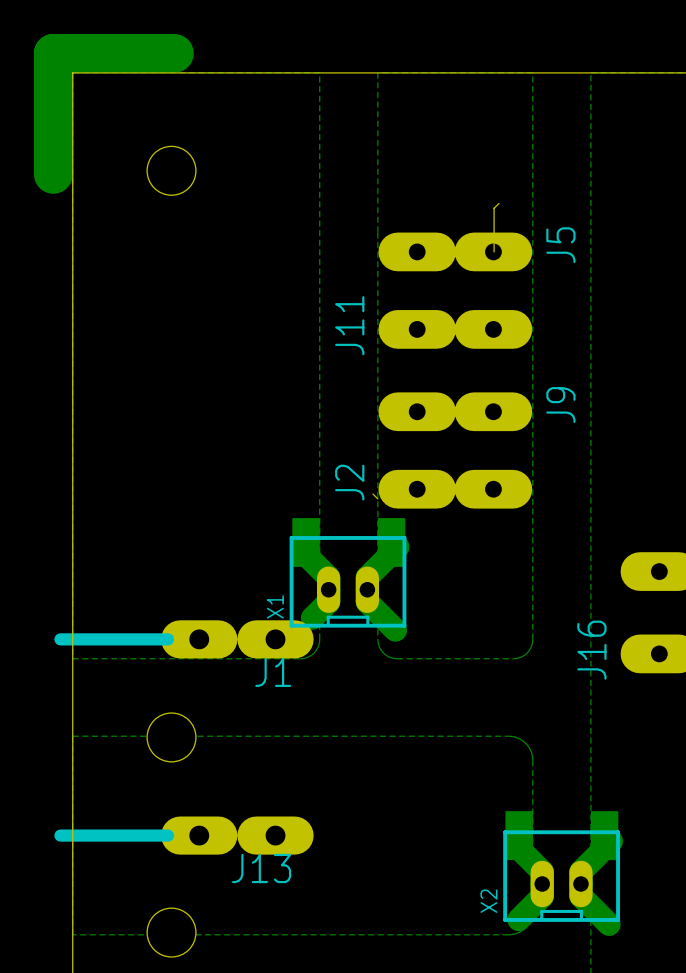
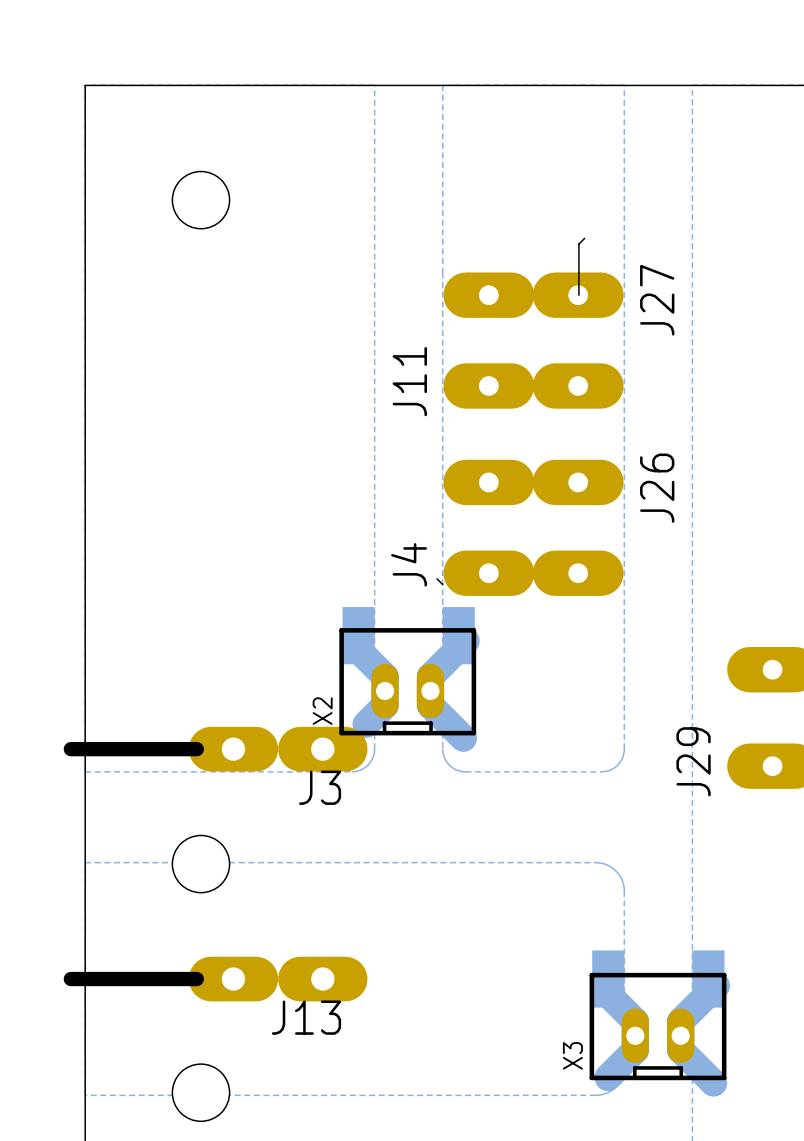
bottom track: (174, 53) (53, 53) (53, 174) -> none
J5 name: J5 (560, 245) -> J27 (657, 300)
J9 name: J9 (560, 405) -> J26 (657, 488)
J2 name: J2 (349, 482) -> J4 (409, 564)
X1 name: X1 (275, 606) -> X2 (322, 711)
J16 name: J16 (591, 650) -> J29 (693, 761)
J1 name: J1 (273, 672) -> J3 (320, 787)
X2 name: X2 (488, 901) -> X3 (572, 1055)

